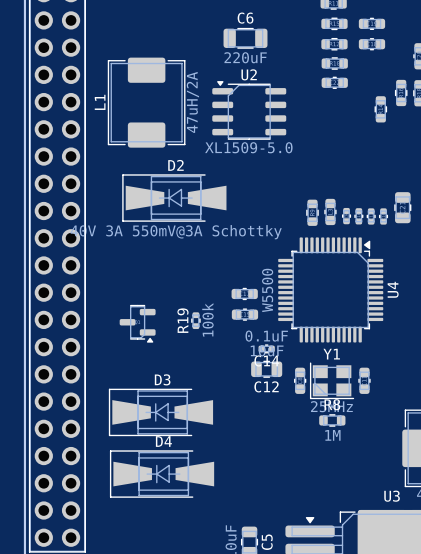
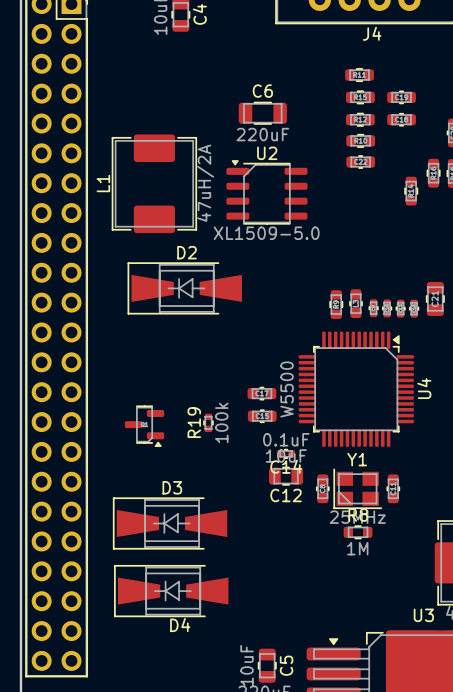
D2 value: 40V 3A 550mV@3A Schottky (176, 232) -> none
D4 name position: D4 (163, 441) -> D4 (180, 625)

